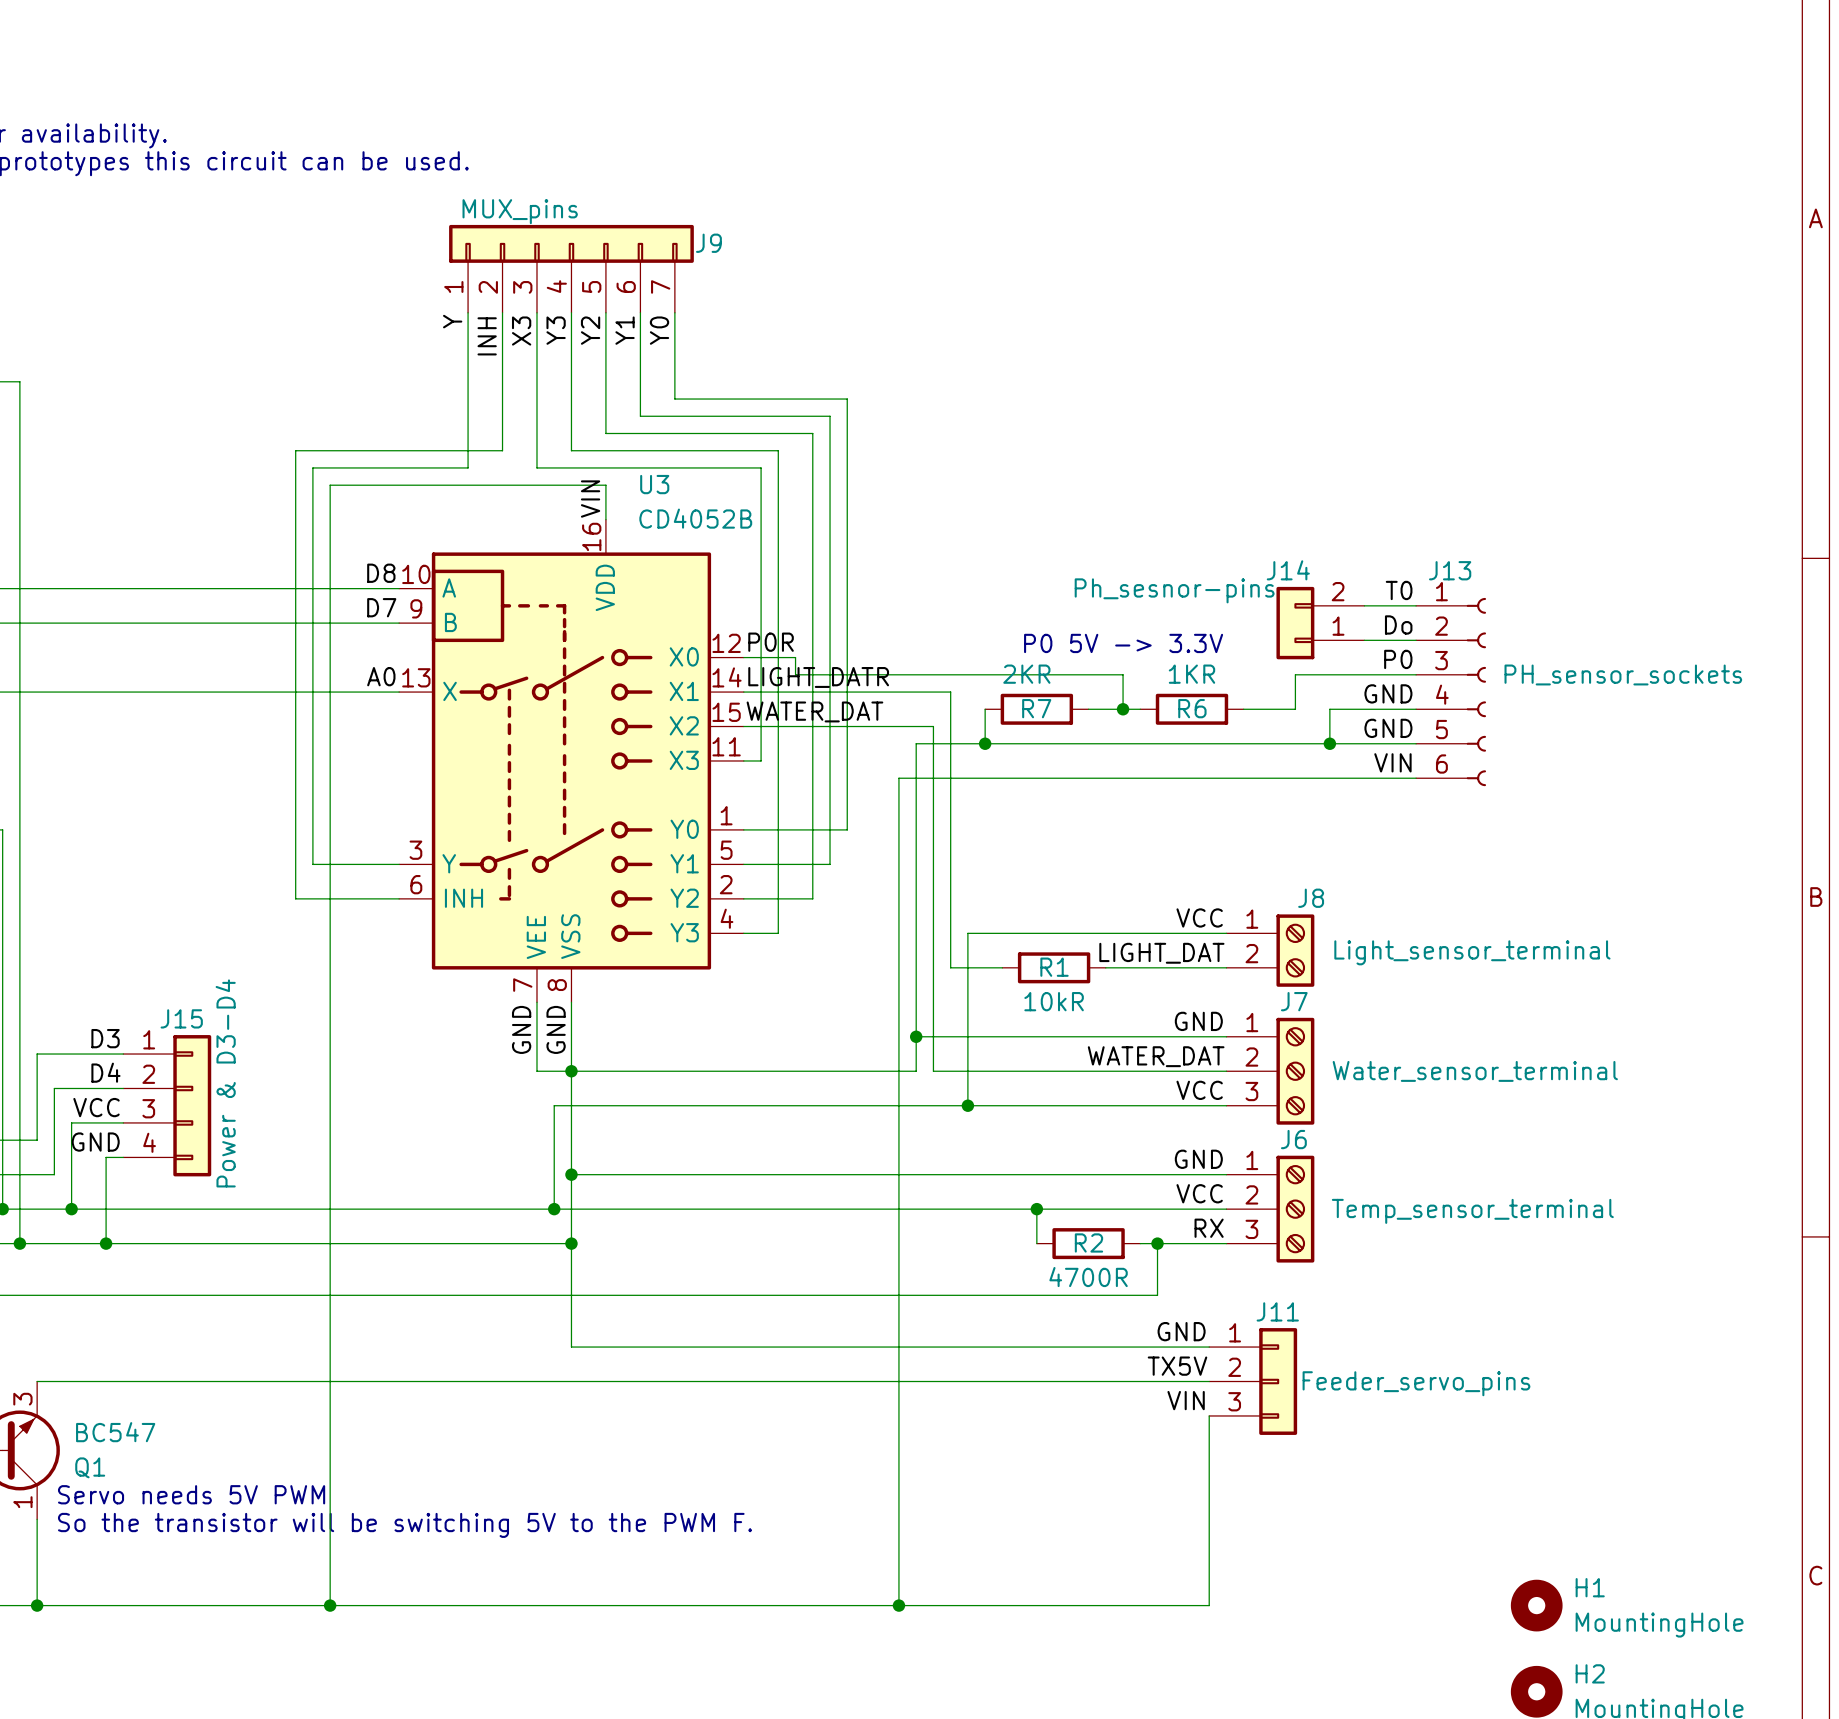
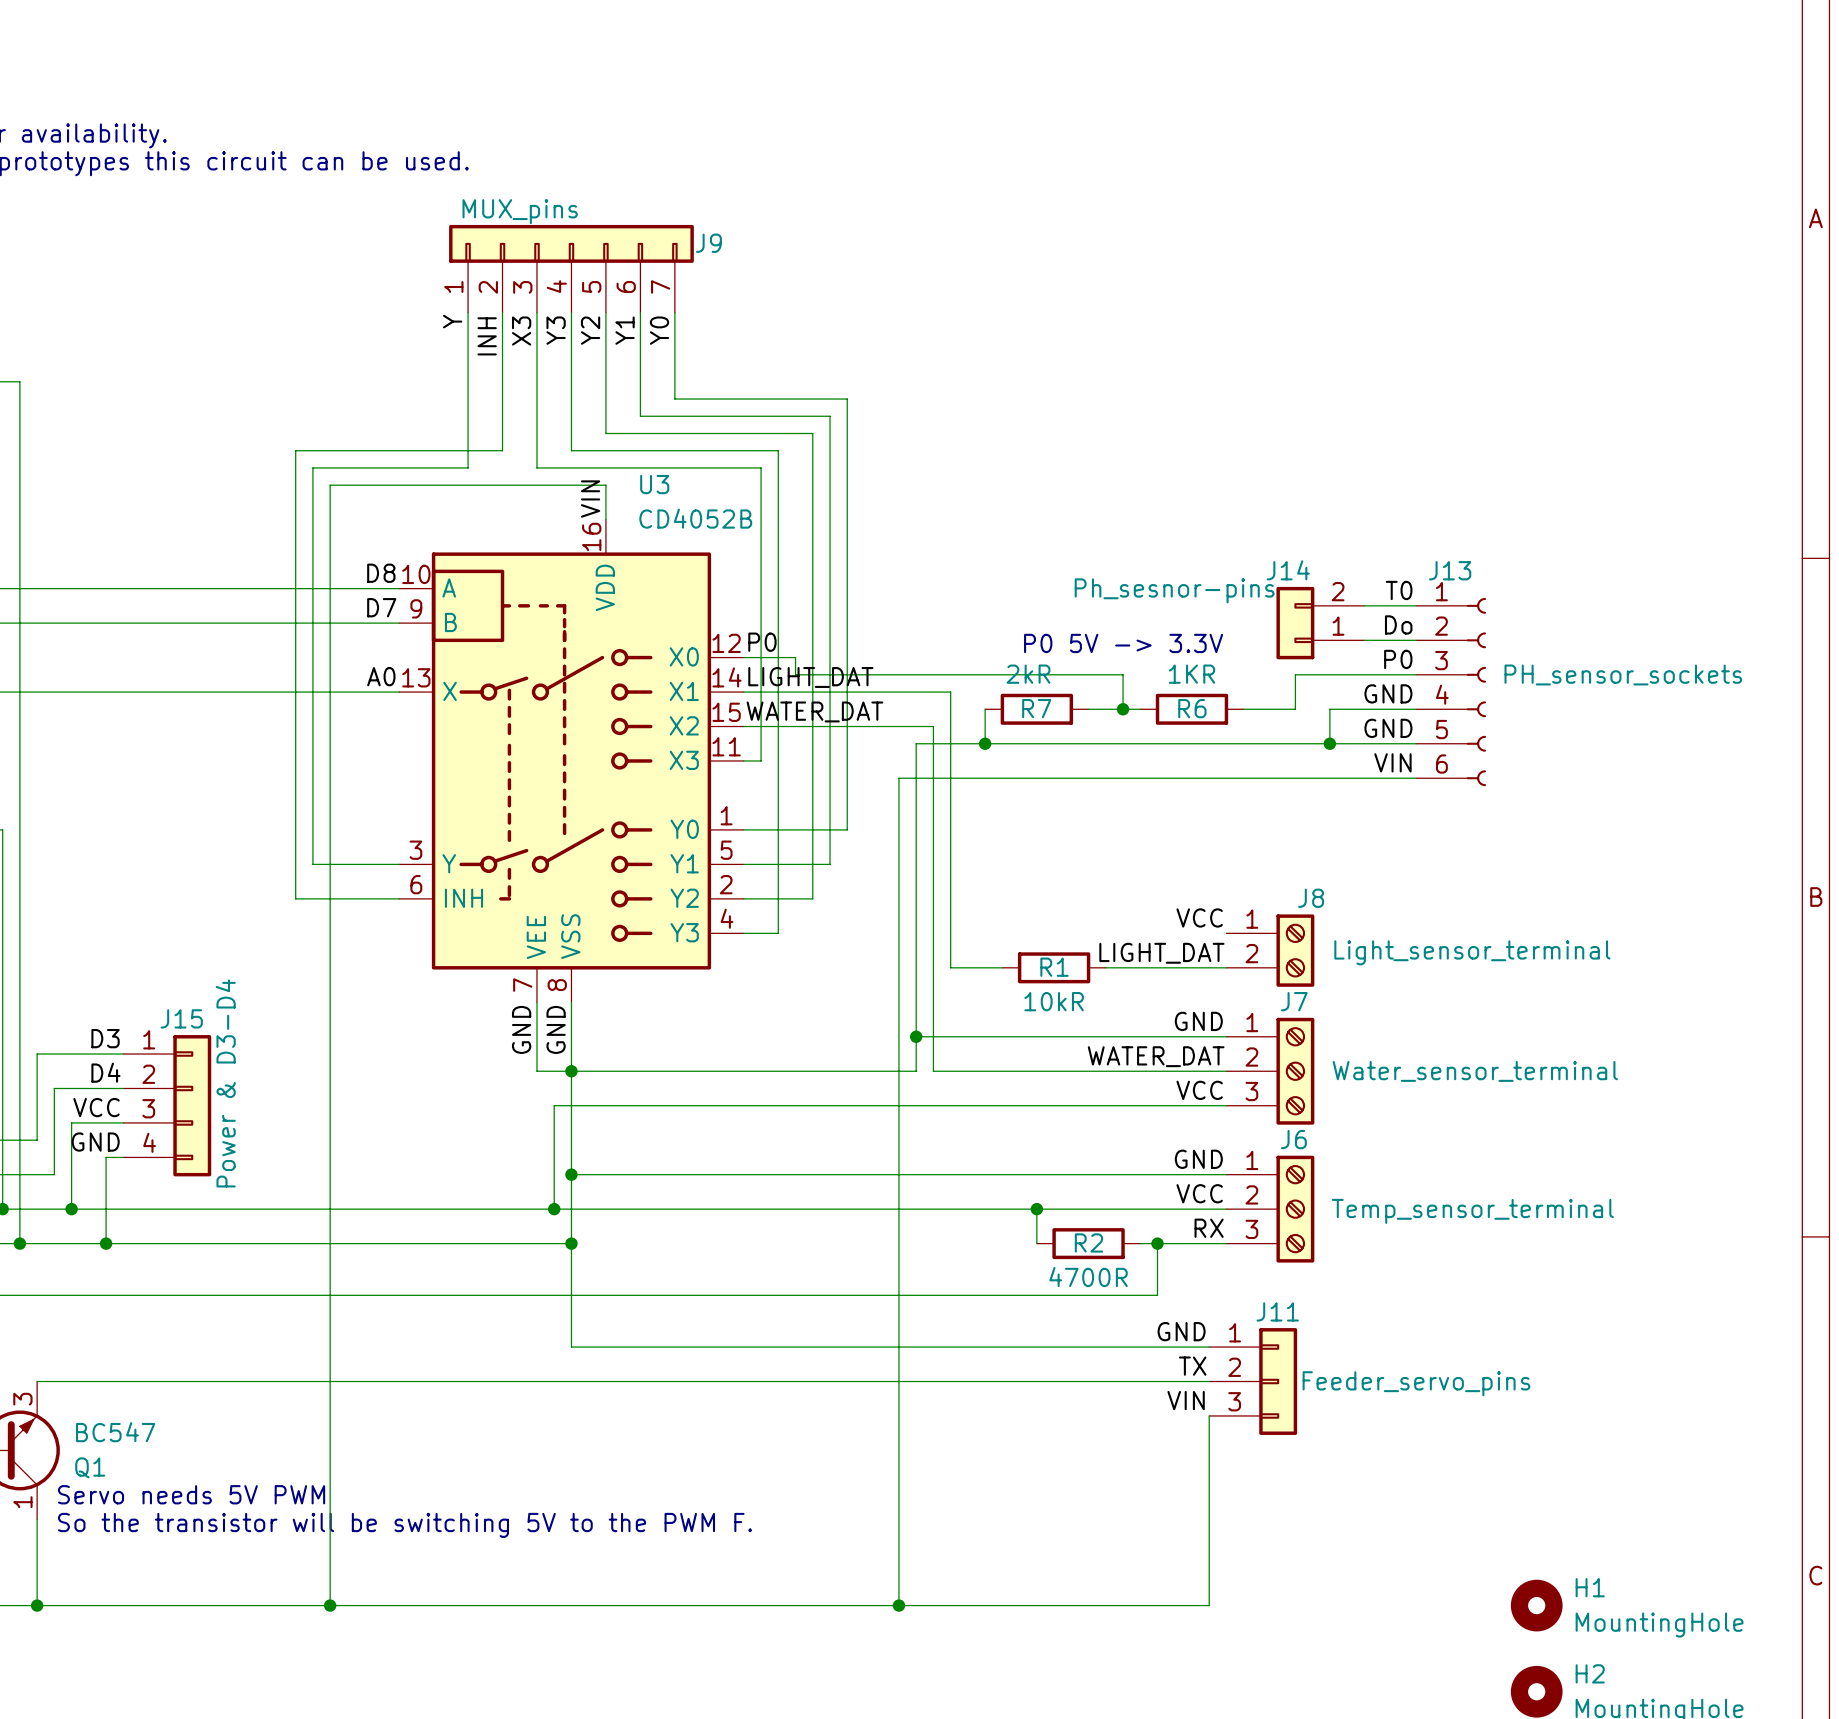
label: P0R (771, 642) -> P0 (762, 642)
R7 value: 2KR (1026, 674) -> 2kR (1028, 674)
label: LIGHT_DATR (818, 677) -> LIGHT_DAT (810, 677)
wire: (1226, 933) (967, 933) (967, 1105) -> none
junction: (967, 1105) -> none
label: TX5V (1177, 1366) -> TX (1192, 1366)

